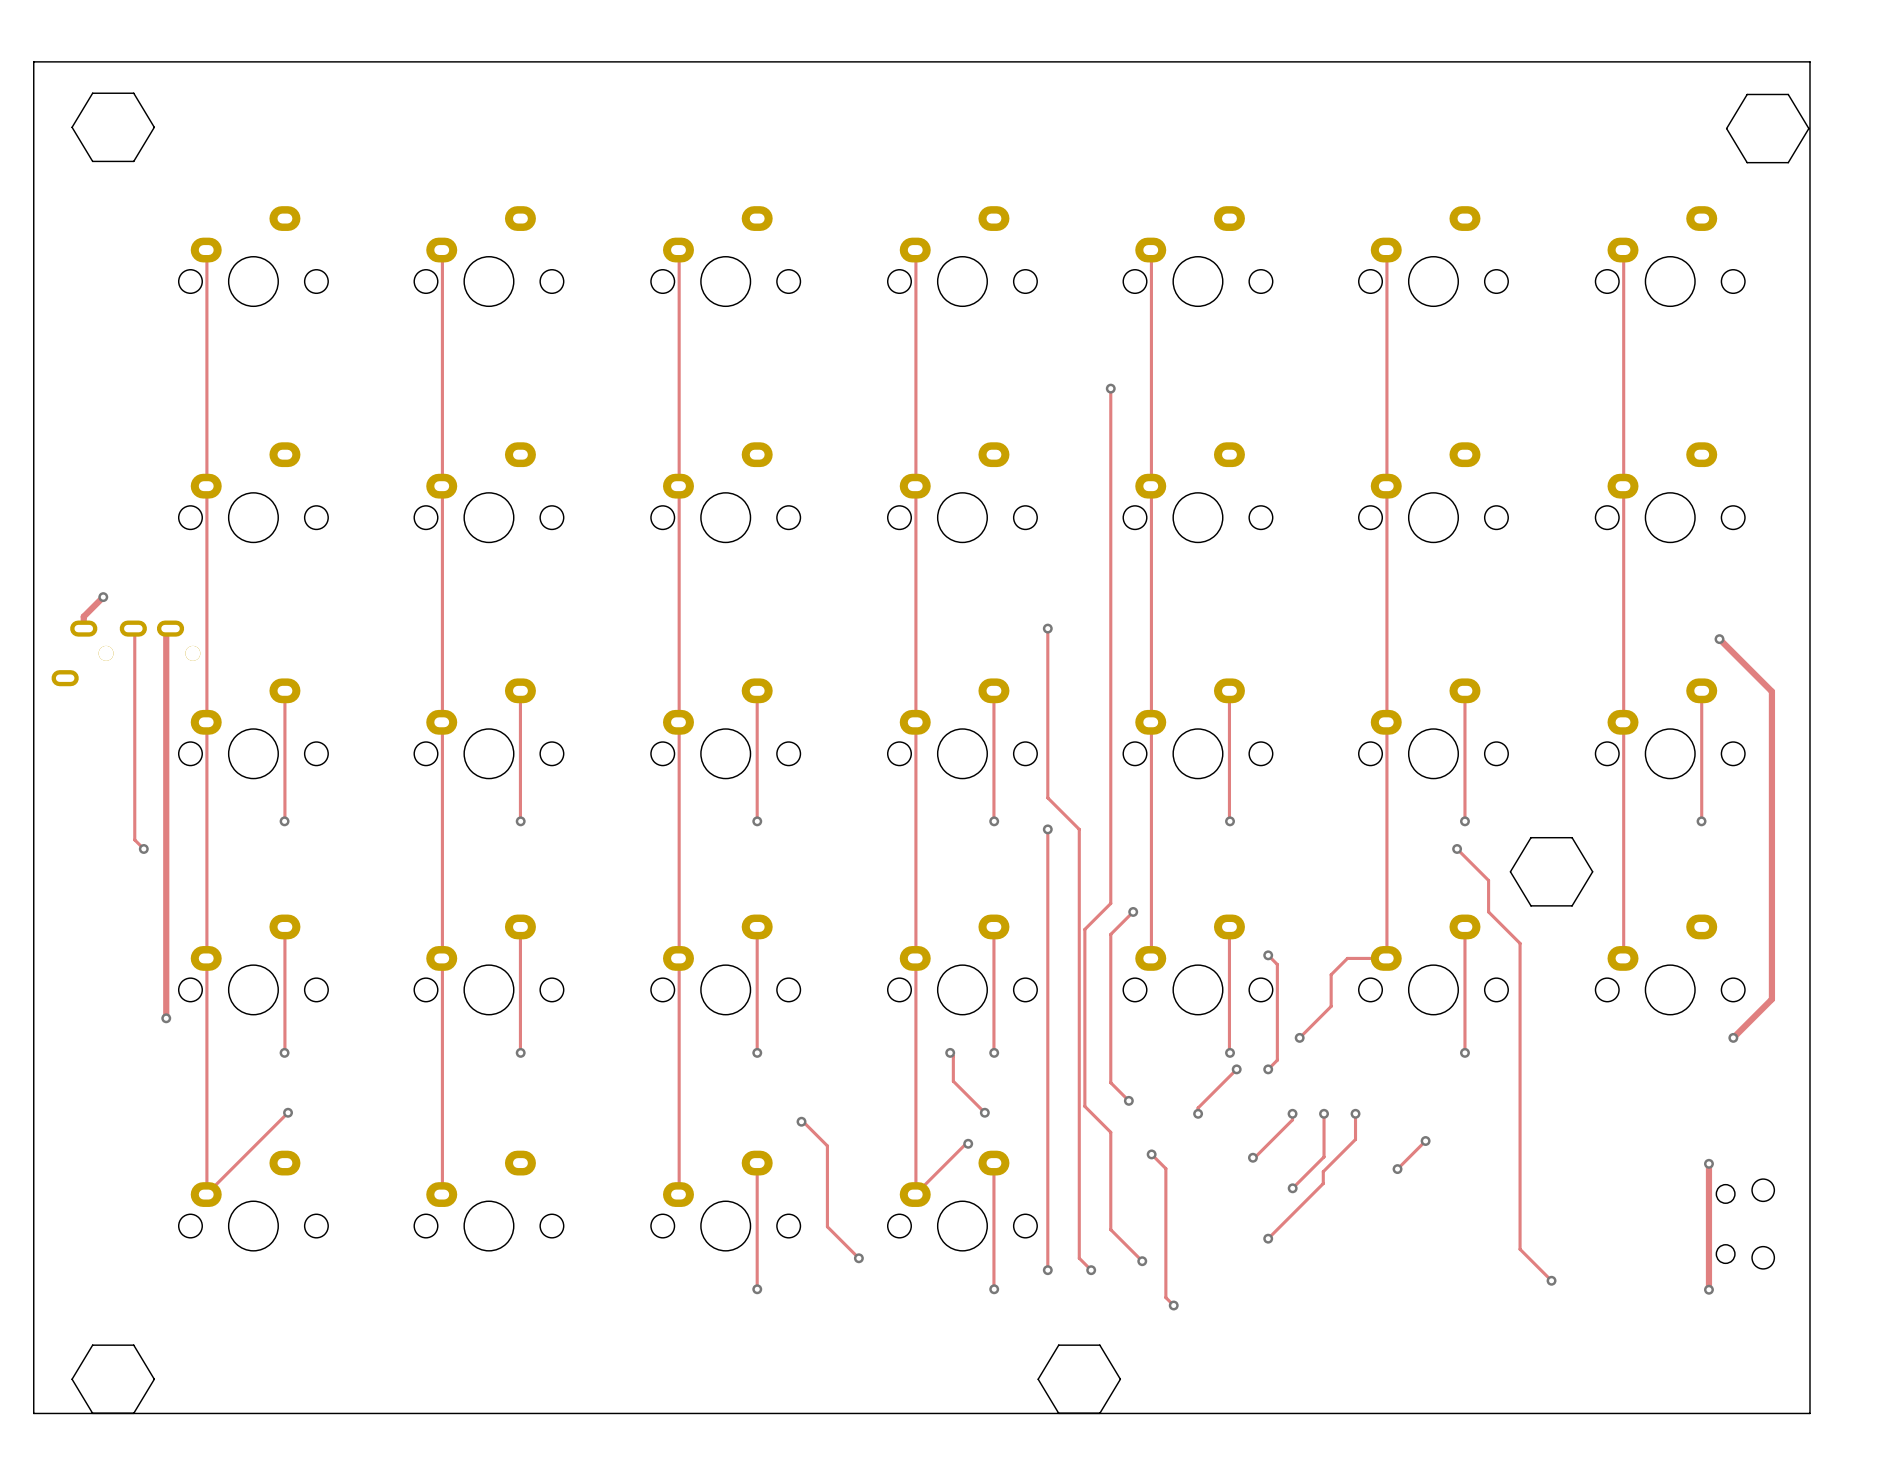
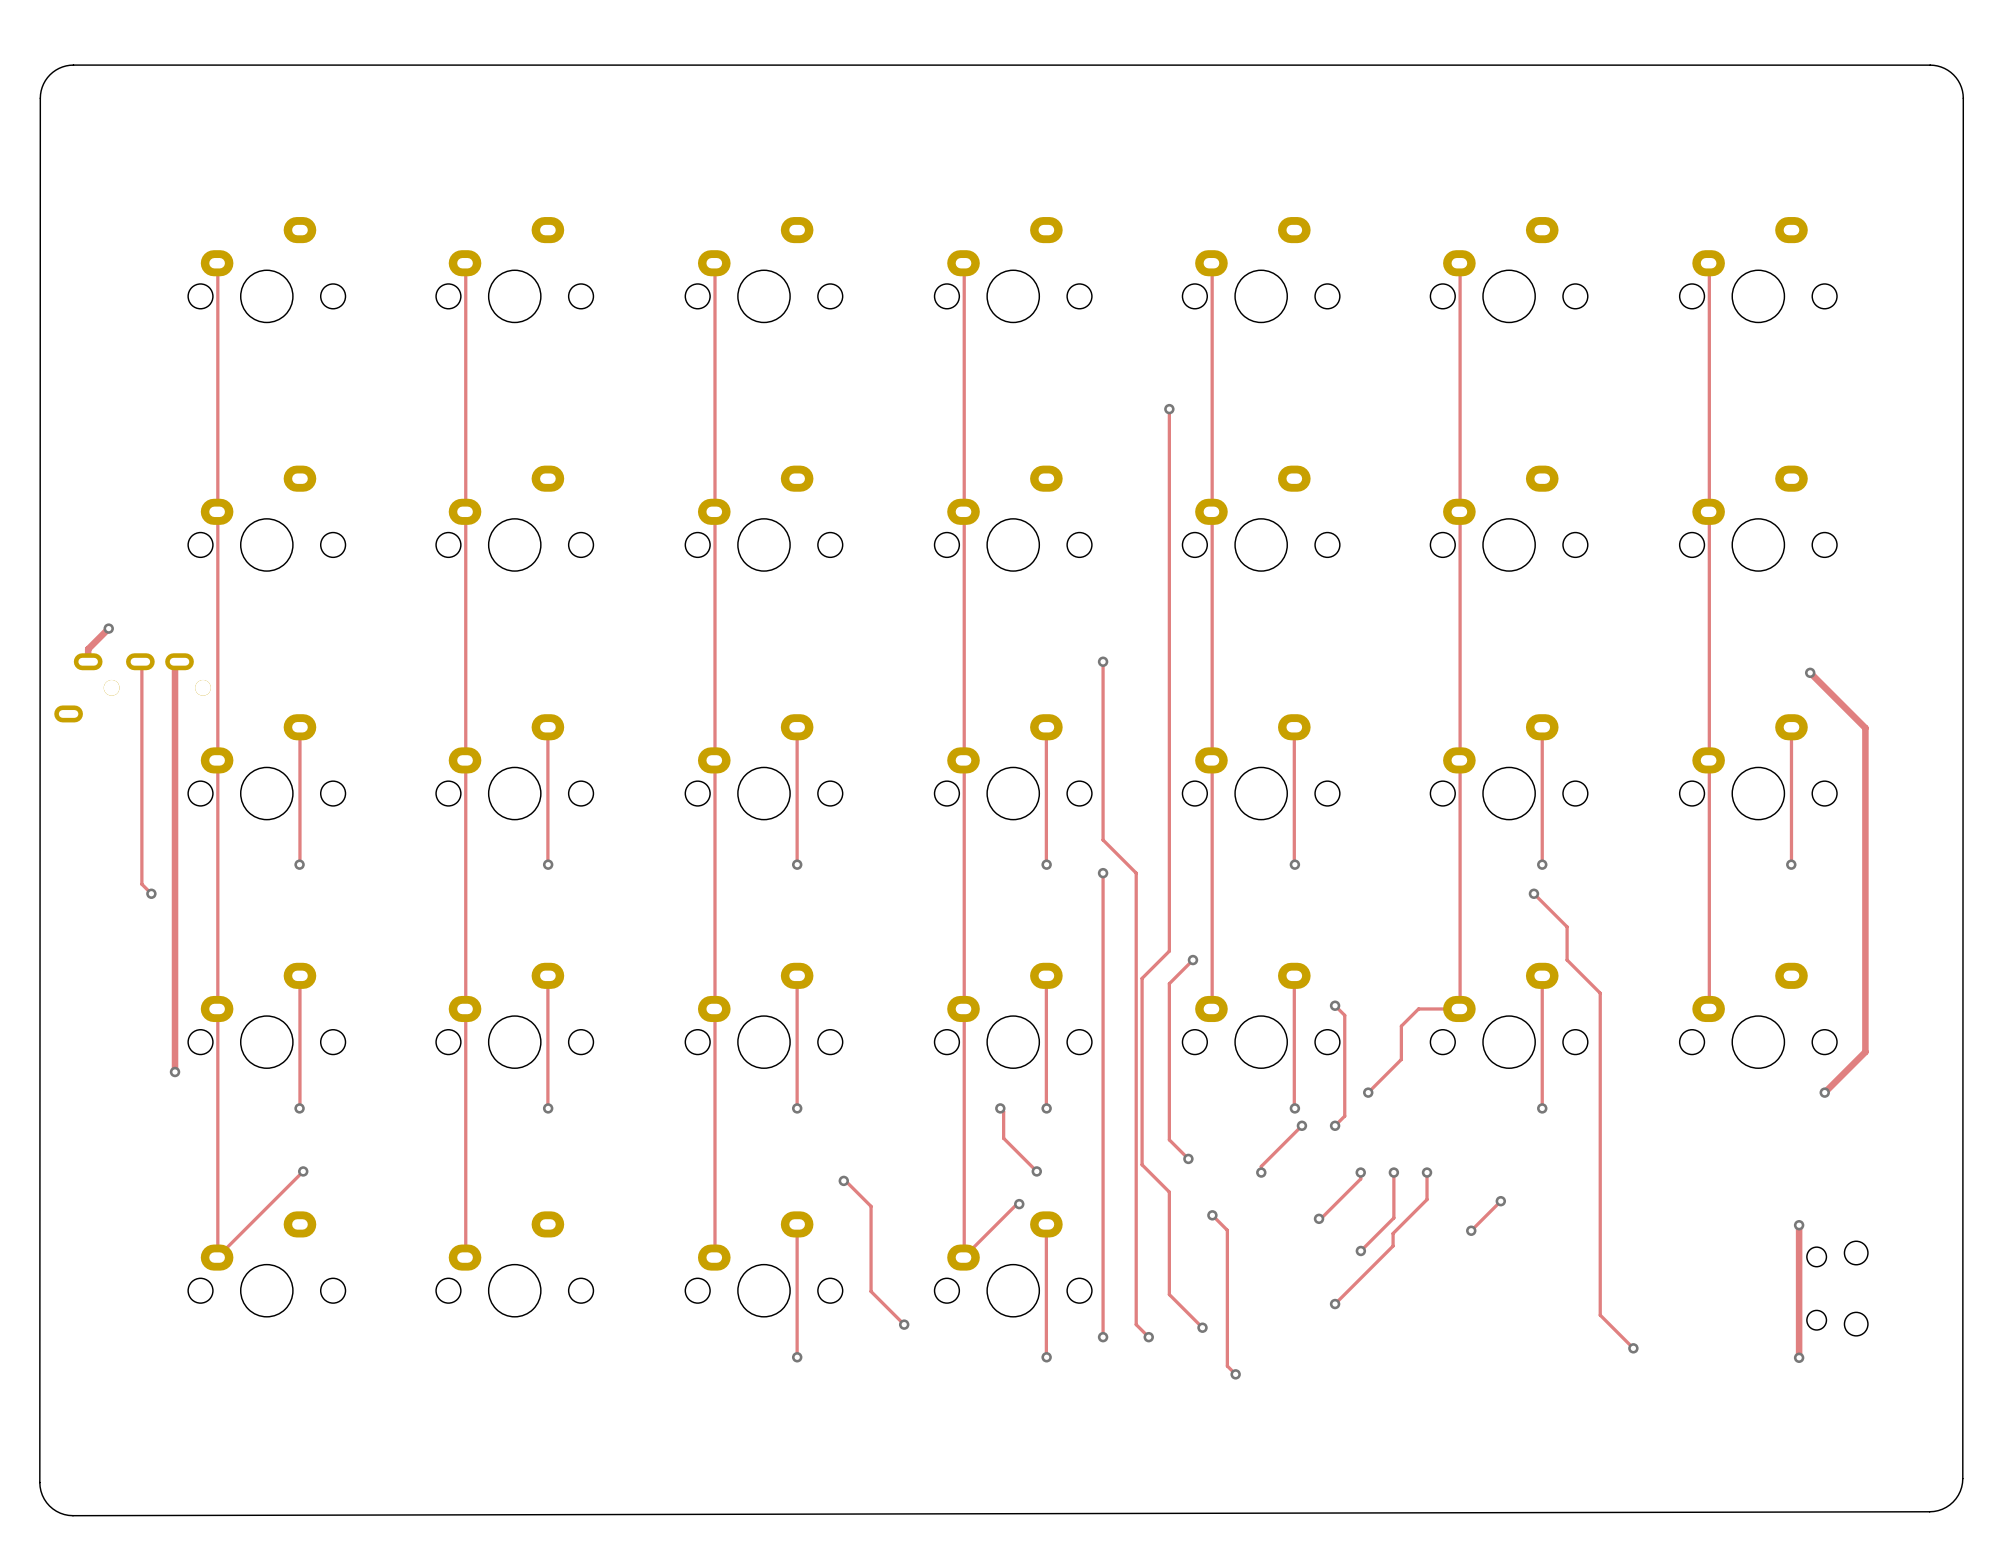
board edge: (33, 61) (1809, 61) (1809, 1413) (33, 1413) (33, 61) -> (73, 65) (62, 66) (50, 74) (42, 87) (40, 98) (39, 1482) (42, 1495) (52, 1508) (60, 1513) (72, 1515) (1929, 1511) (1946, 1507) (1955, 1498) (1961, 1487) (1962, 1478) (1963, 98) (1960, 83) (1950, 72) (1941, 67) (1930, 65) (73, 65)
drawing: [71, 92, 155, 162] -> none
drawing: [1726, 94, 1810, 163] -> none
drawing: [1510, 837, 1593, 907] -> none
drawing: [71, 1344, 155, 1414] -> none
drawing: [1037, 1344, 1121, 1414] -> none

